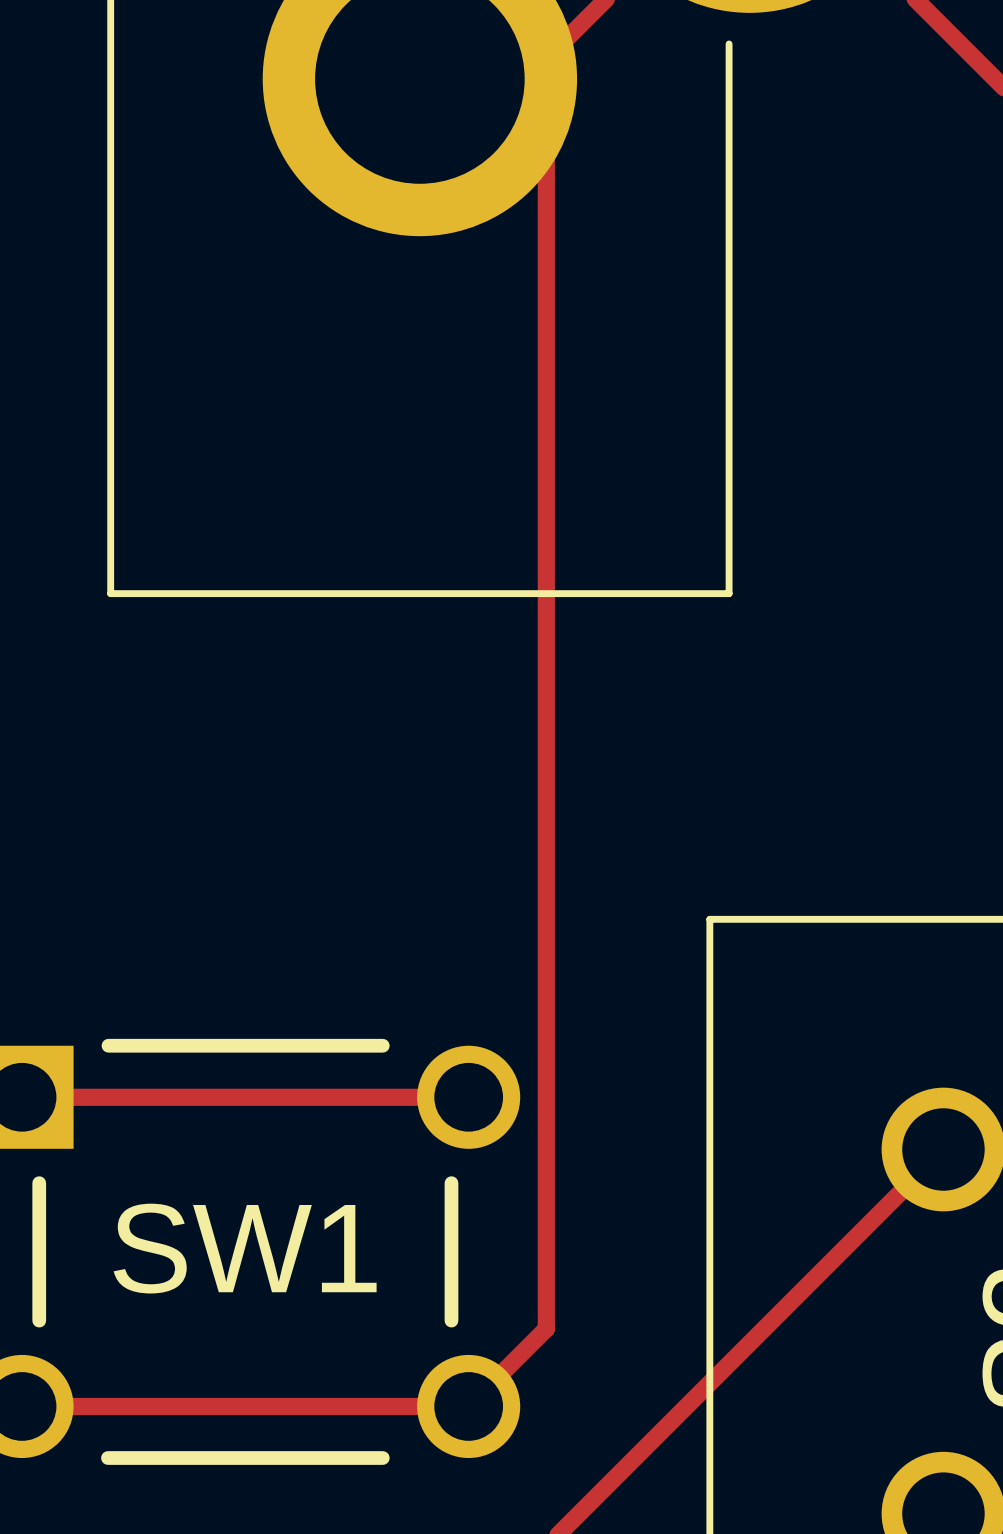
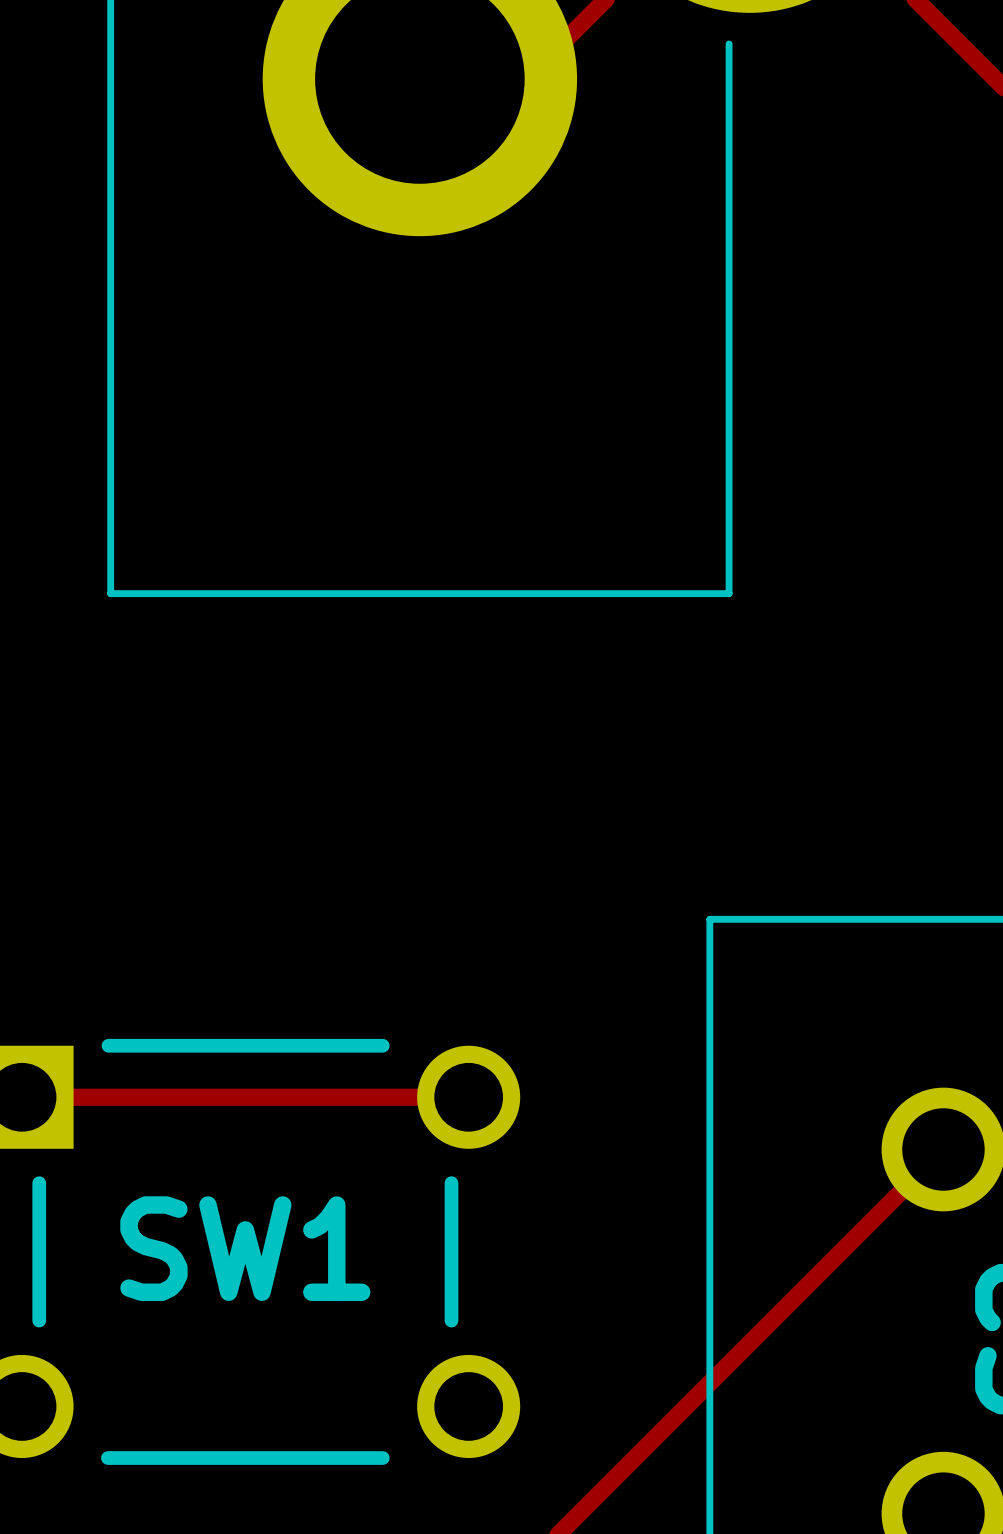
track: (526, 78) (546, 98) (546, 1328) (468, 1406) (22, 1406) -> none

